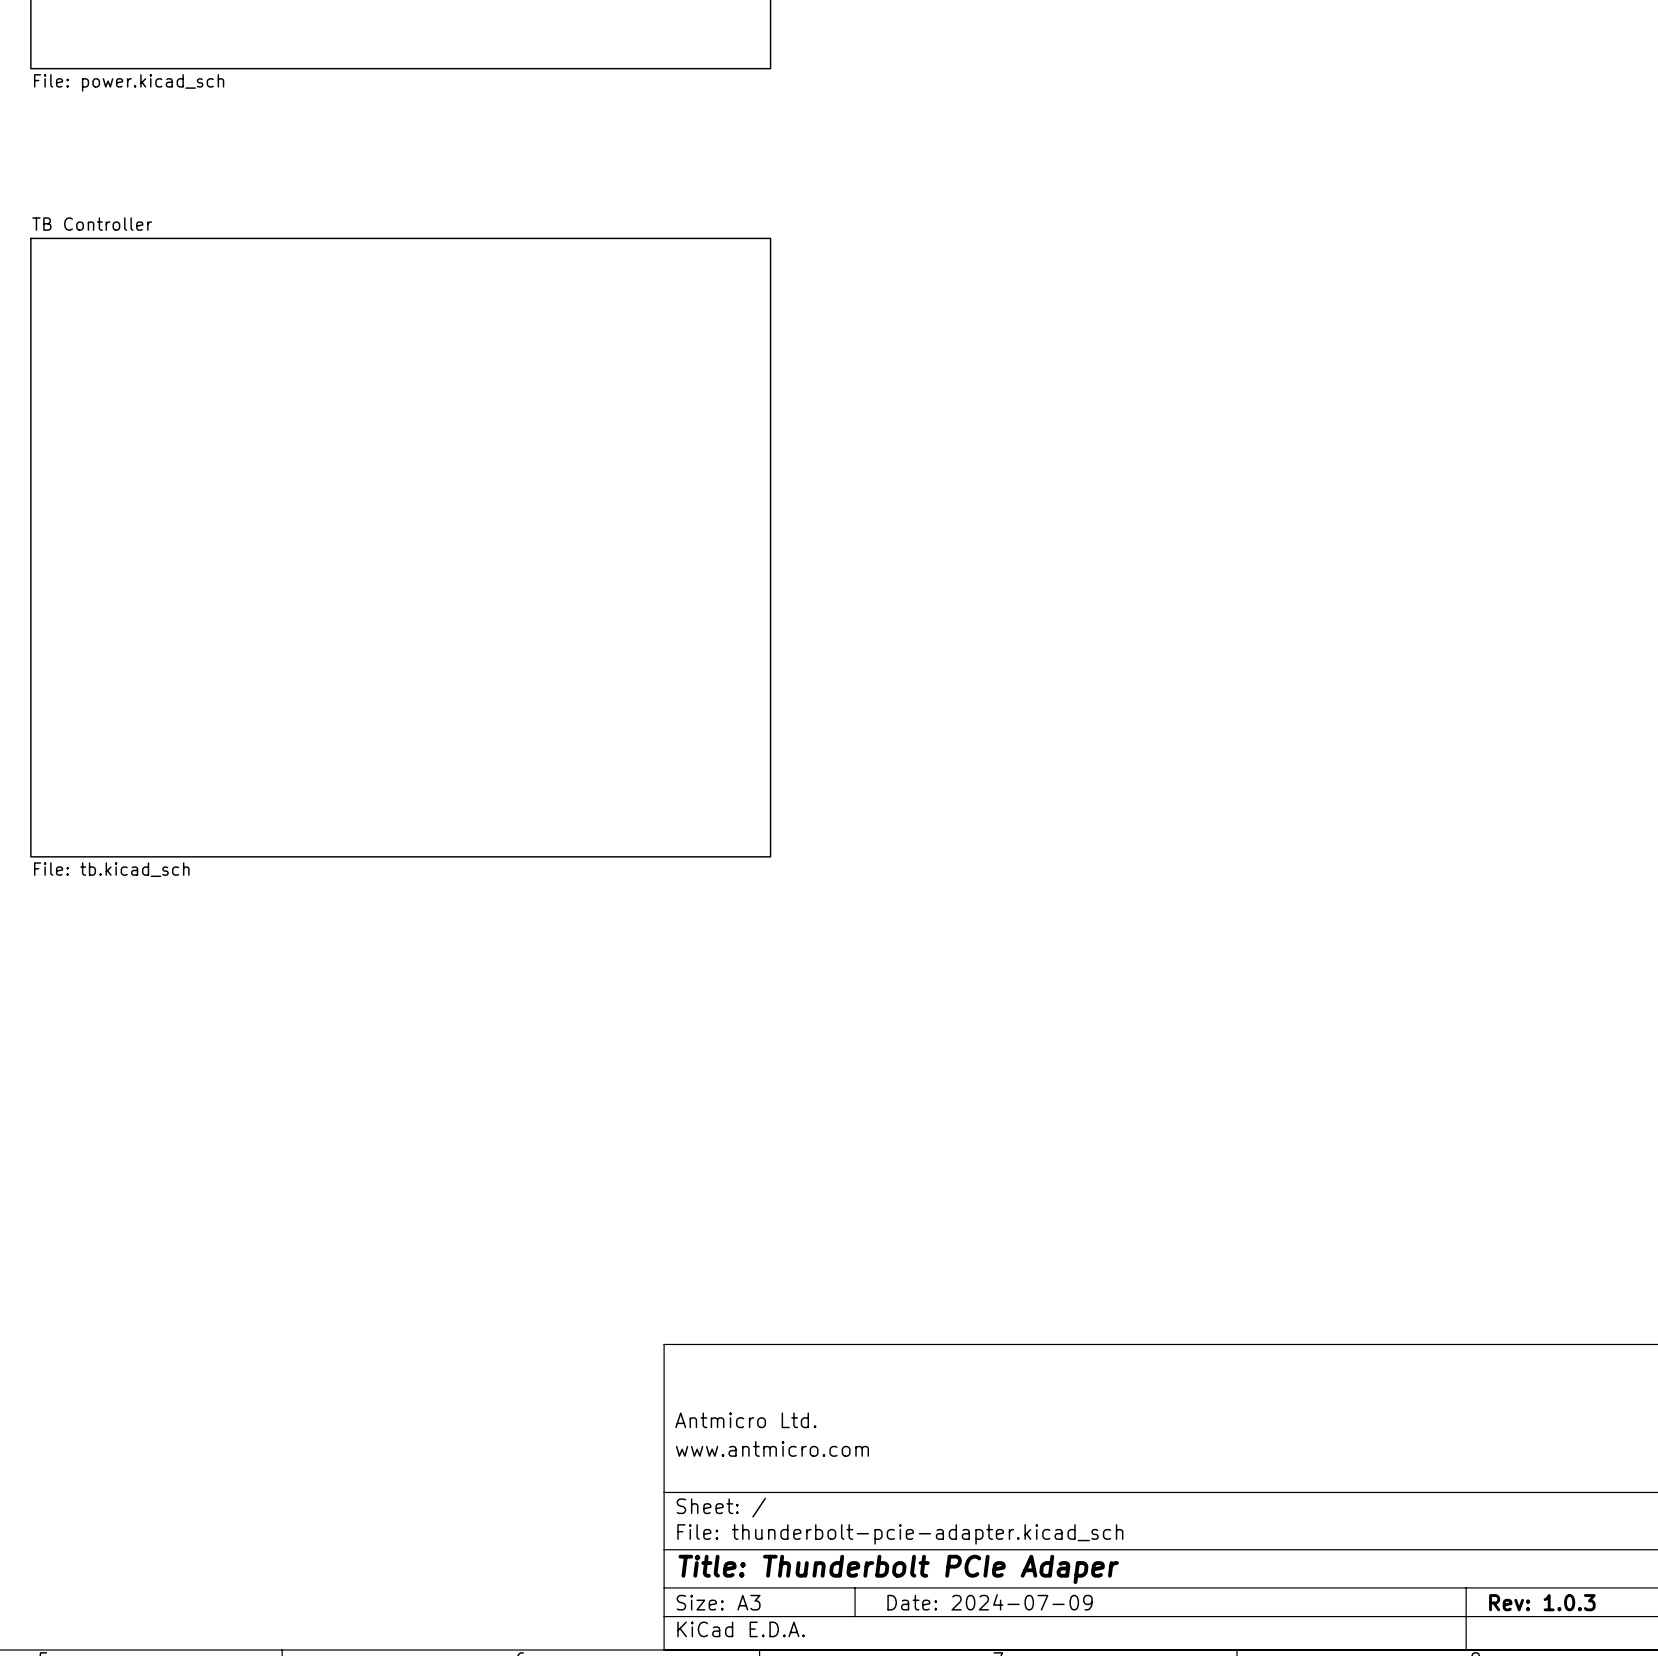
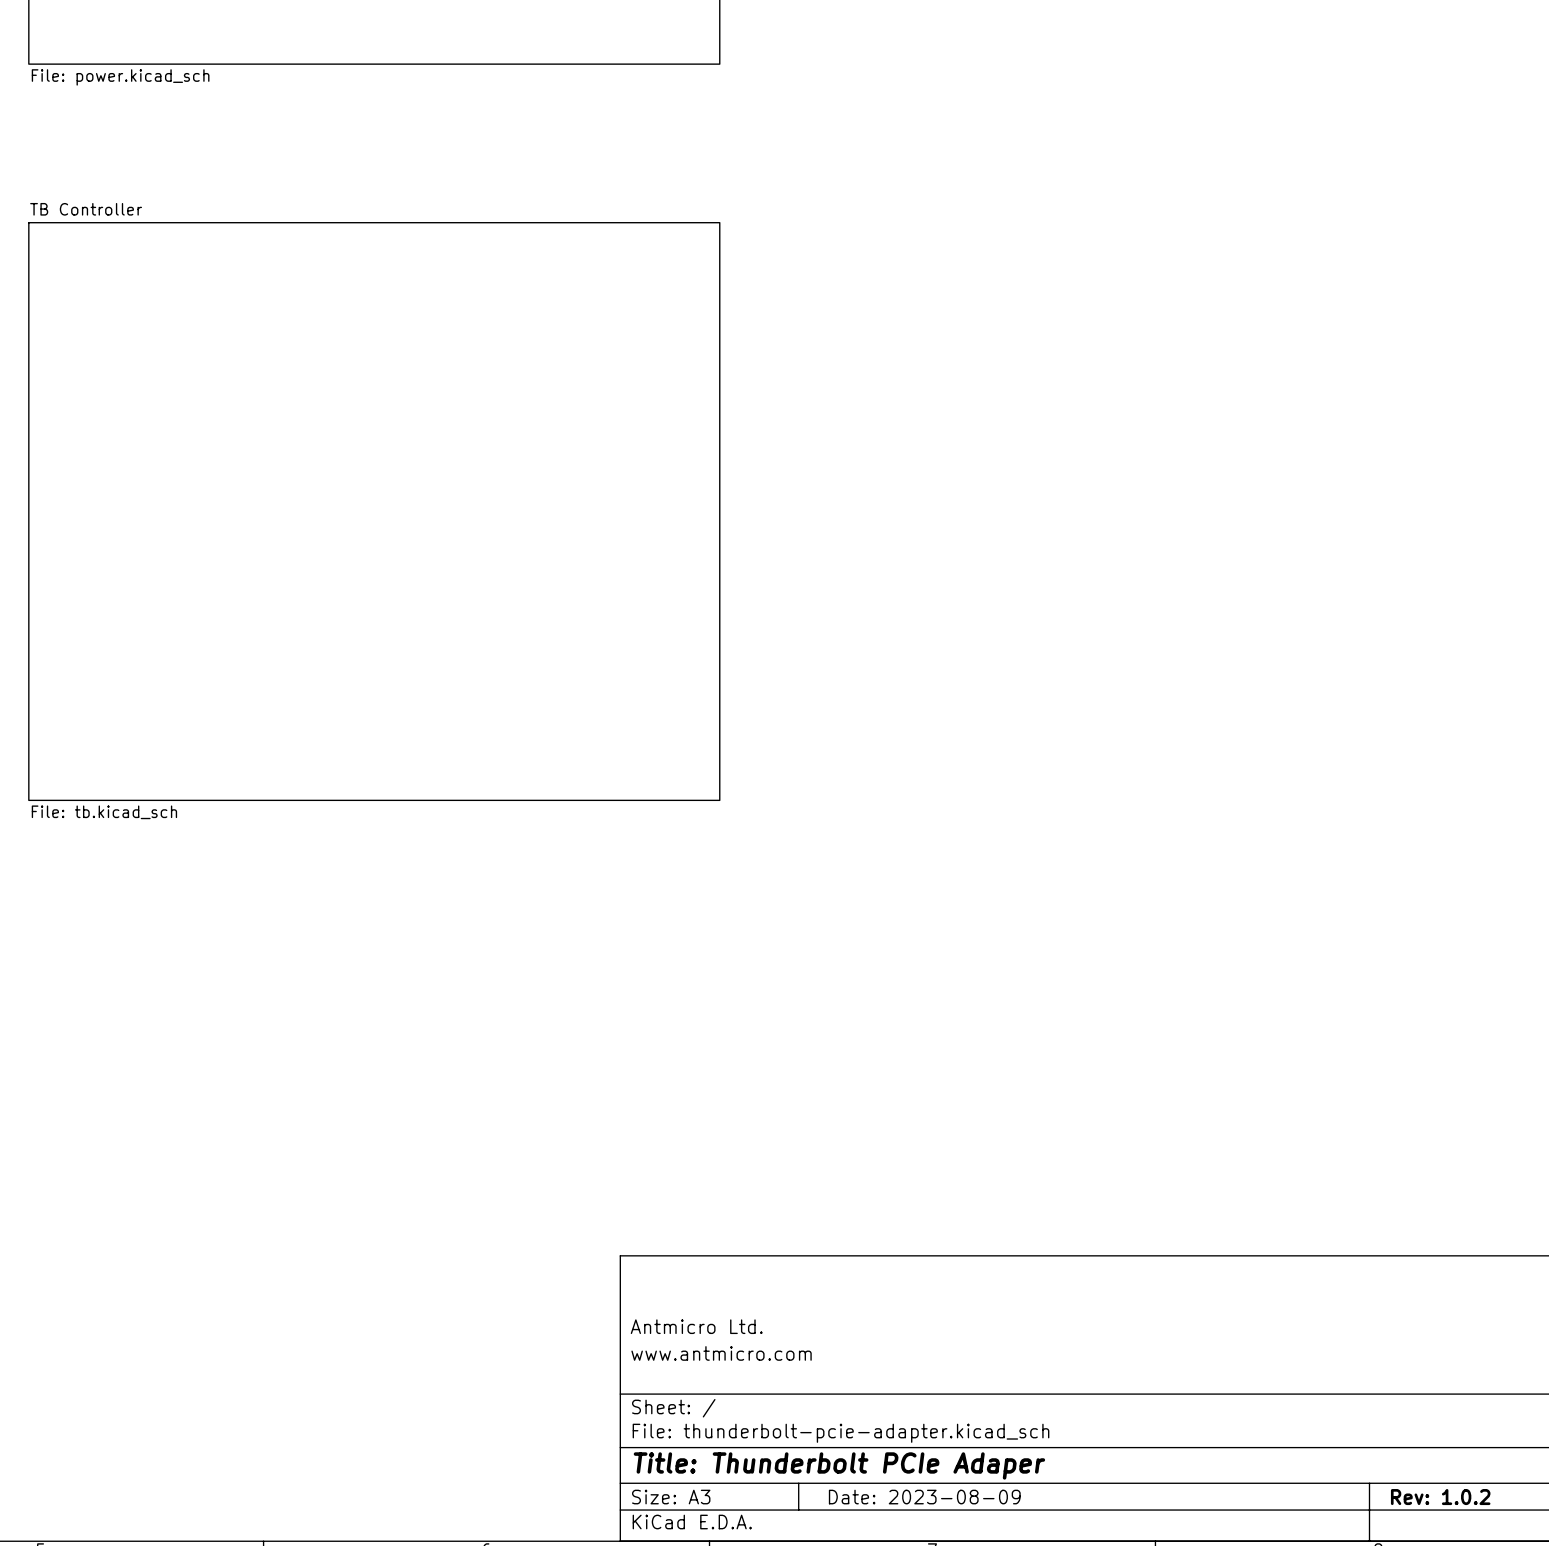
title block: Date: 2024-07-09 (990, 1602) -> Date: 2023-08-09 (924, 1497)
title block: Rev: 1.0.3 (1542, 1602) -> Rev: 1.0.2 (1440, 1497)

